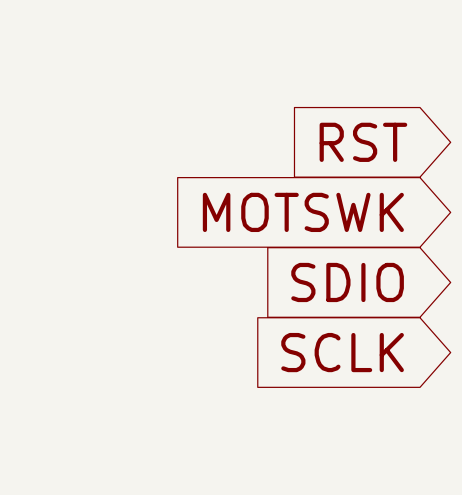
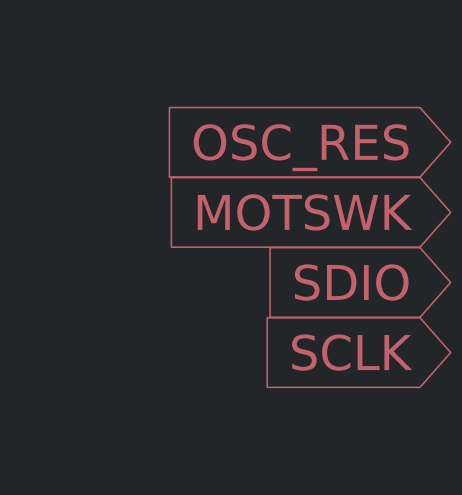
global label: RST (363, 142) -> OSC_RES (301, 147)

